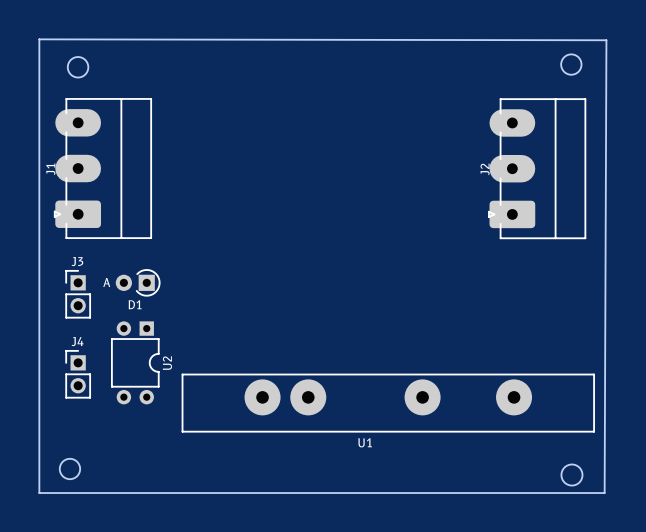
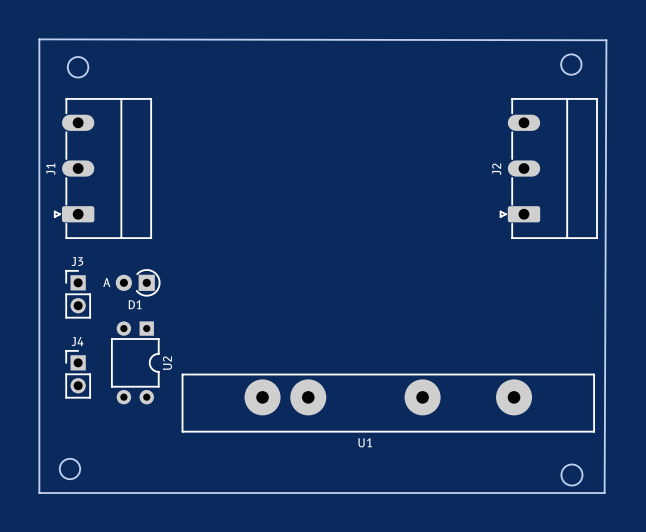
J1 footprint: [54, 98, 152, 239] -> [54, 98, 152, 239]
J2 footprint: [488, 98, 586, 239] -> [500, 98, 598, 239]

